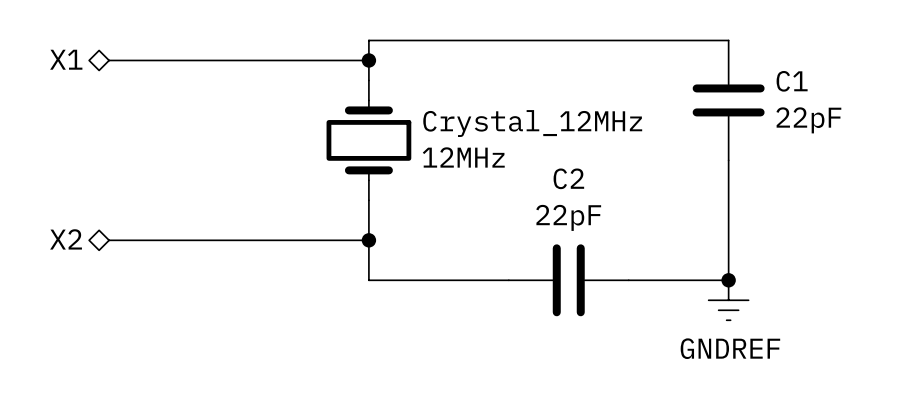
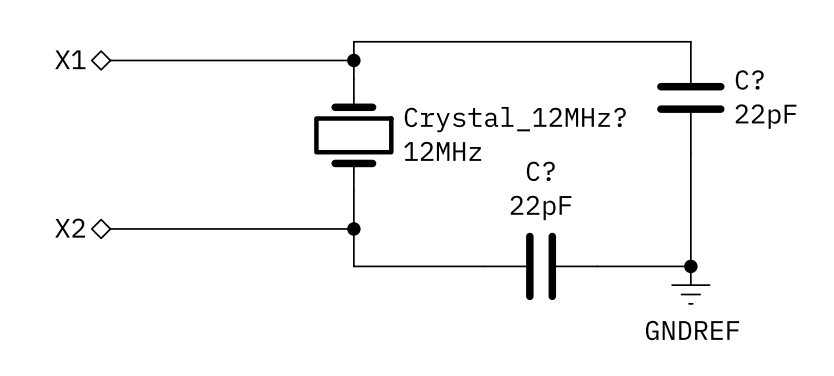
C1 name: C1 (792, 81) -> C? (749, 80)
Crystal_12MHz name: Crystal_12MHz (532, 123) -> Crystal_12MHz? (515, 119)
C2 name: C2 (568, 178) -> C? (540, 171)

